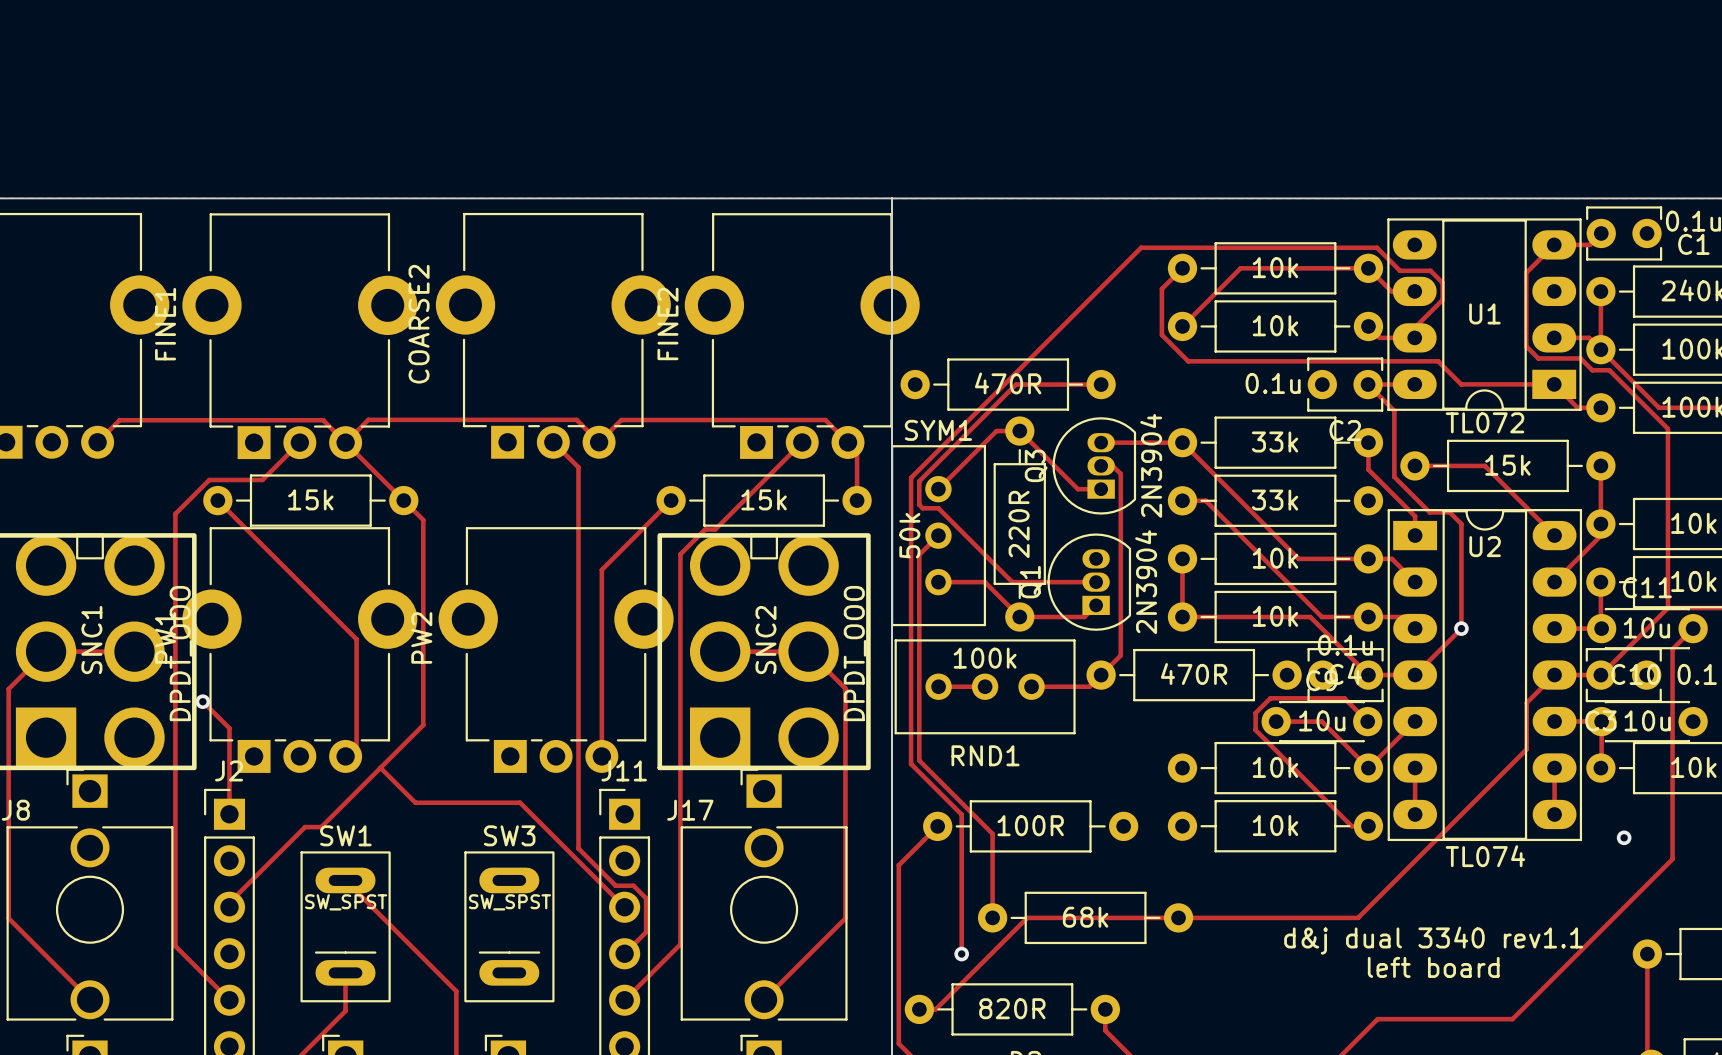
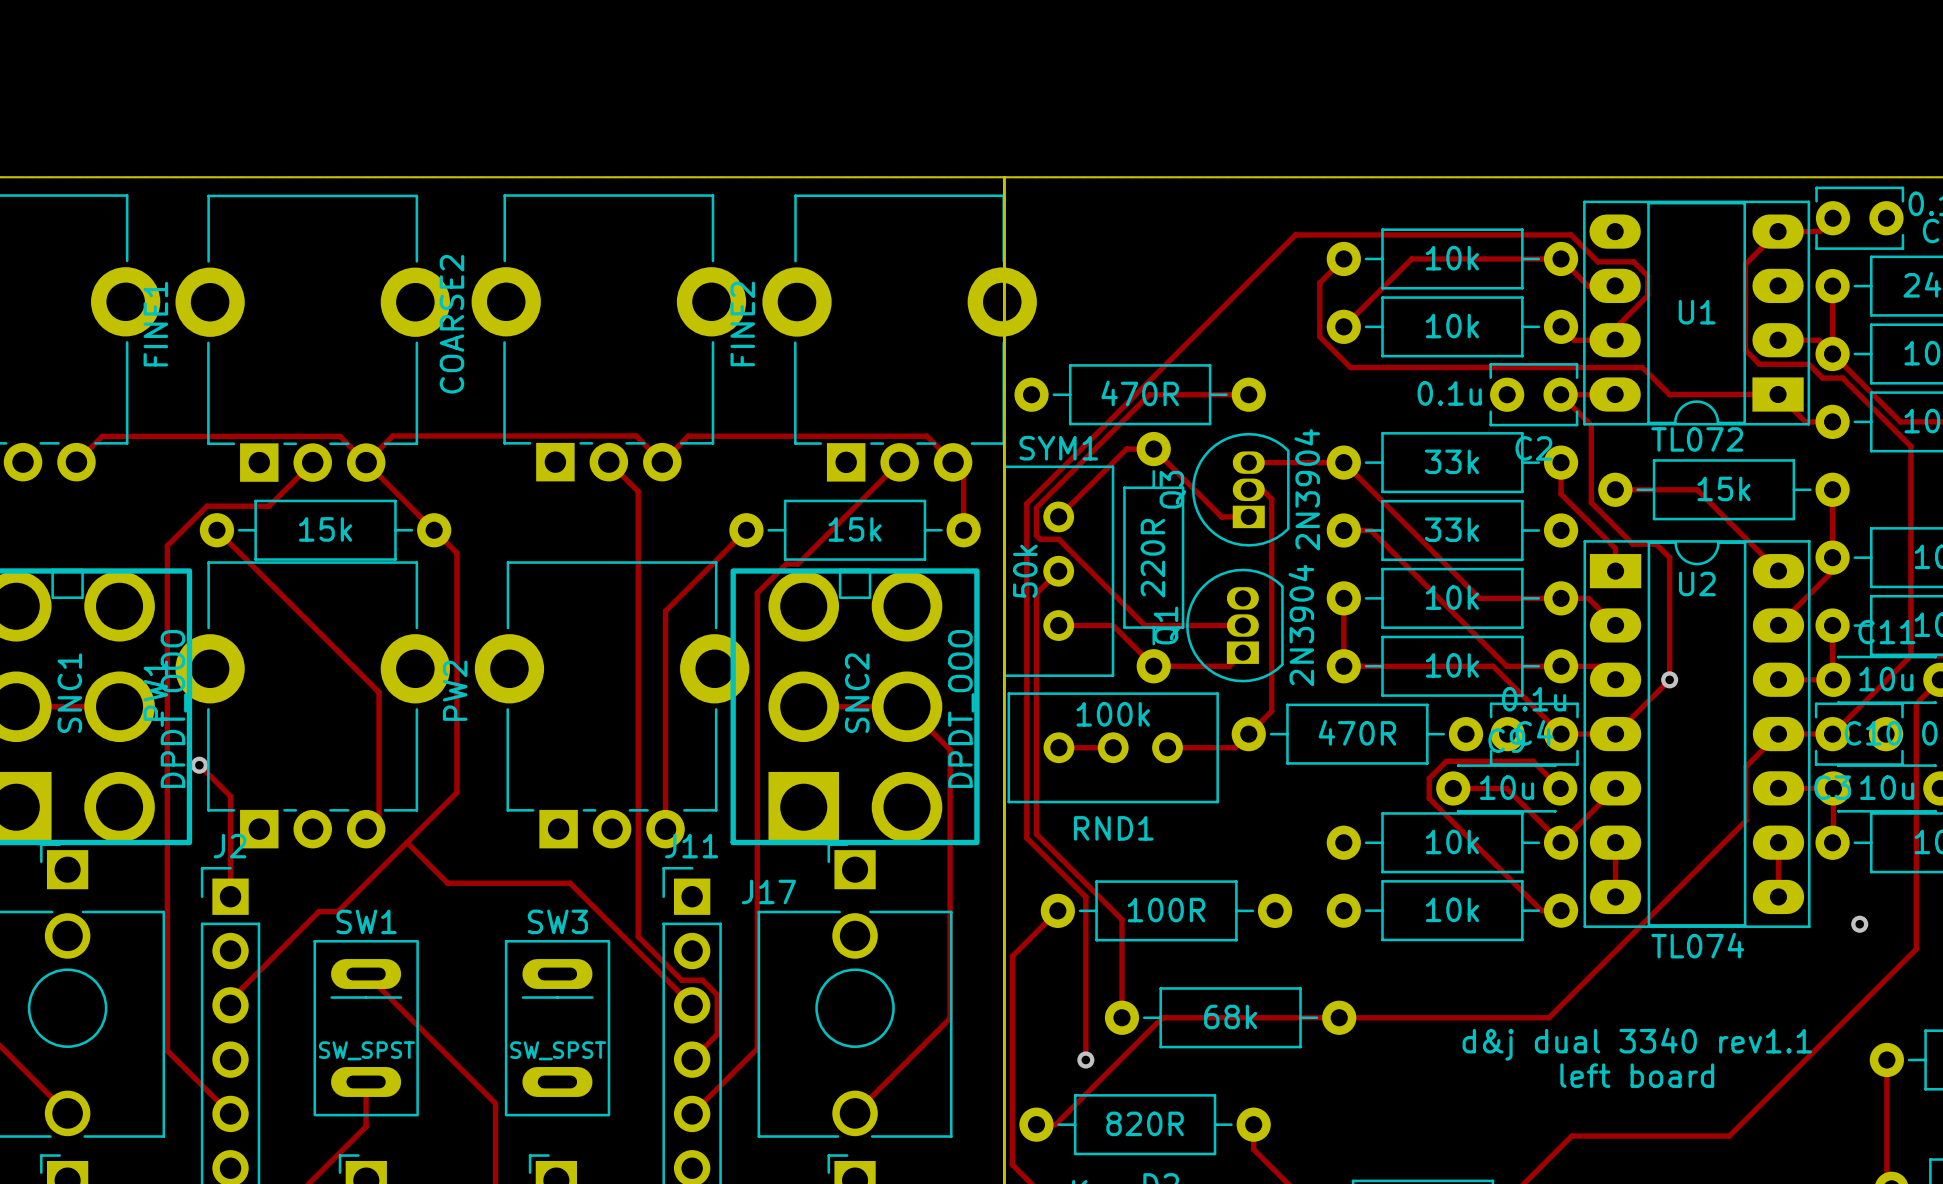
SW1 footprint: [300, 851, 391, 1003] -> [313, 940, 419, 1117]
SW3 footprint: [464, 851, 555, 1003] -> [504, 940, 611, 1117]
SW1 value position: SW_SPST (346, 902) -> SW_SPST (366, 1050)
SW3 value position: SW_SPST (509, 902) -> SW_SPST (558, 1050)

